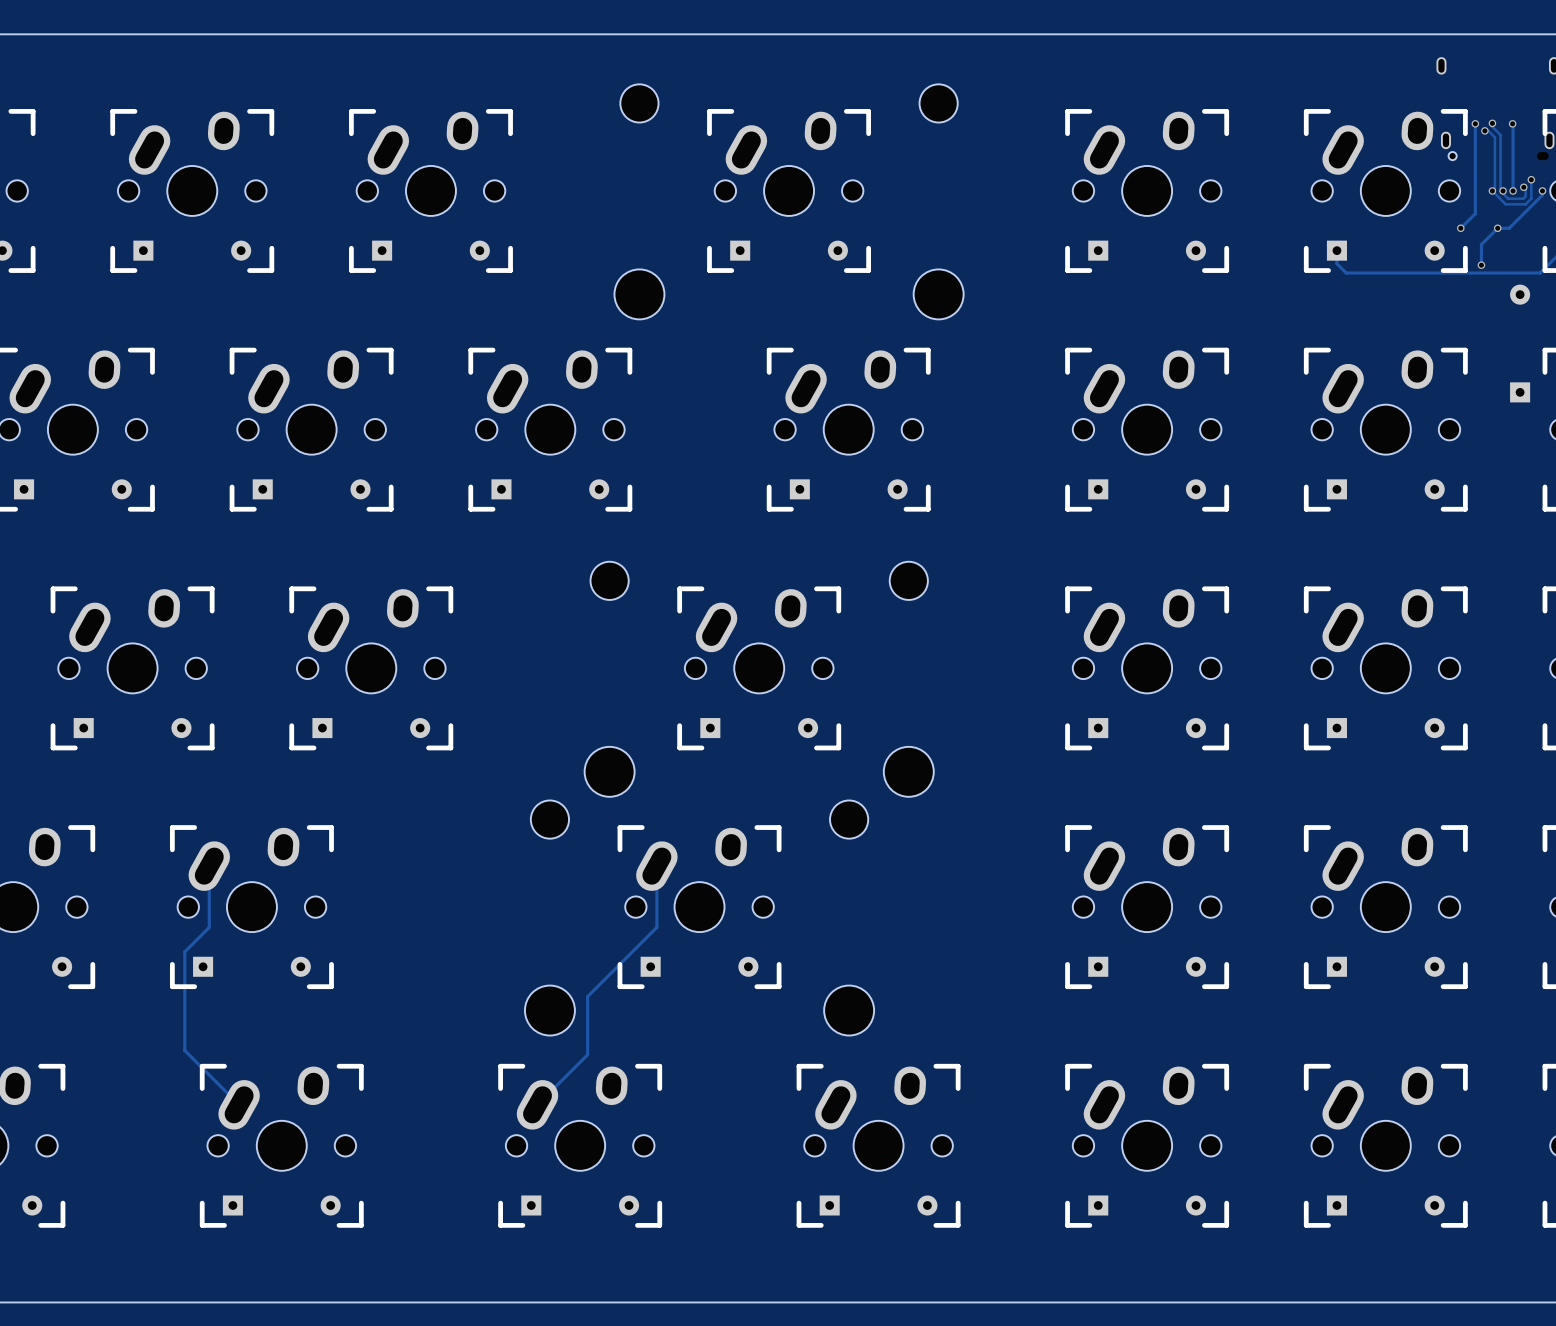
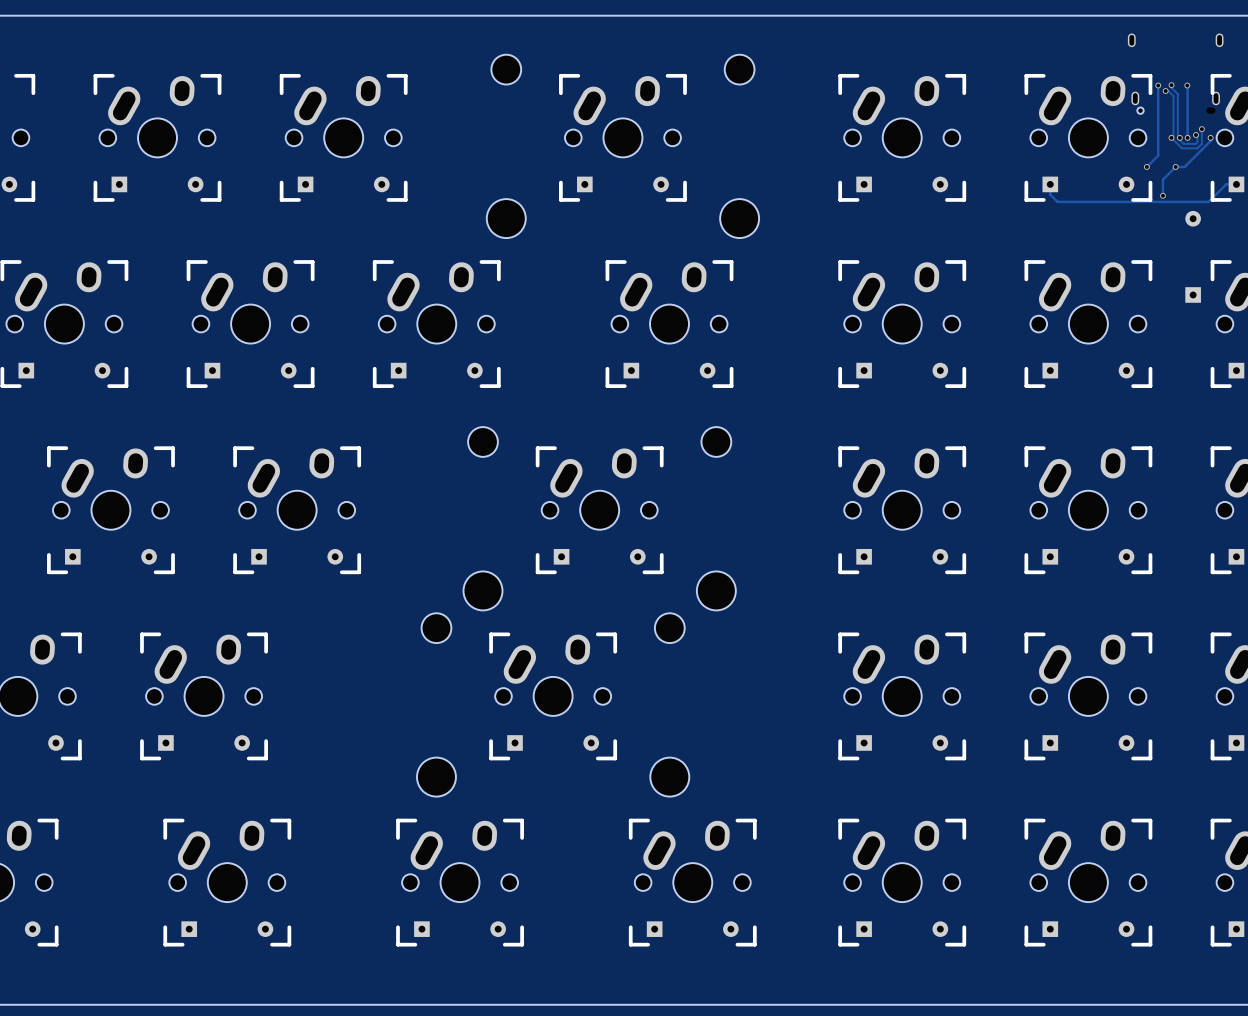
track: (209, 866) (209, 927) (184, 951) (184, 1050) (239, 1104) -> none
track: (656, 866) (656, 927) (587, 996) (587, 1054) (537, 1104) -> none

